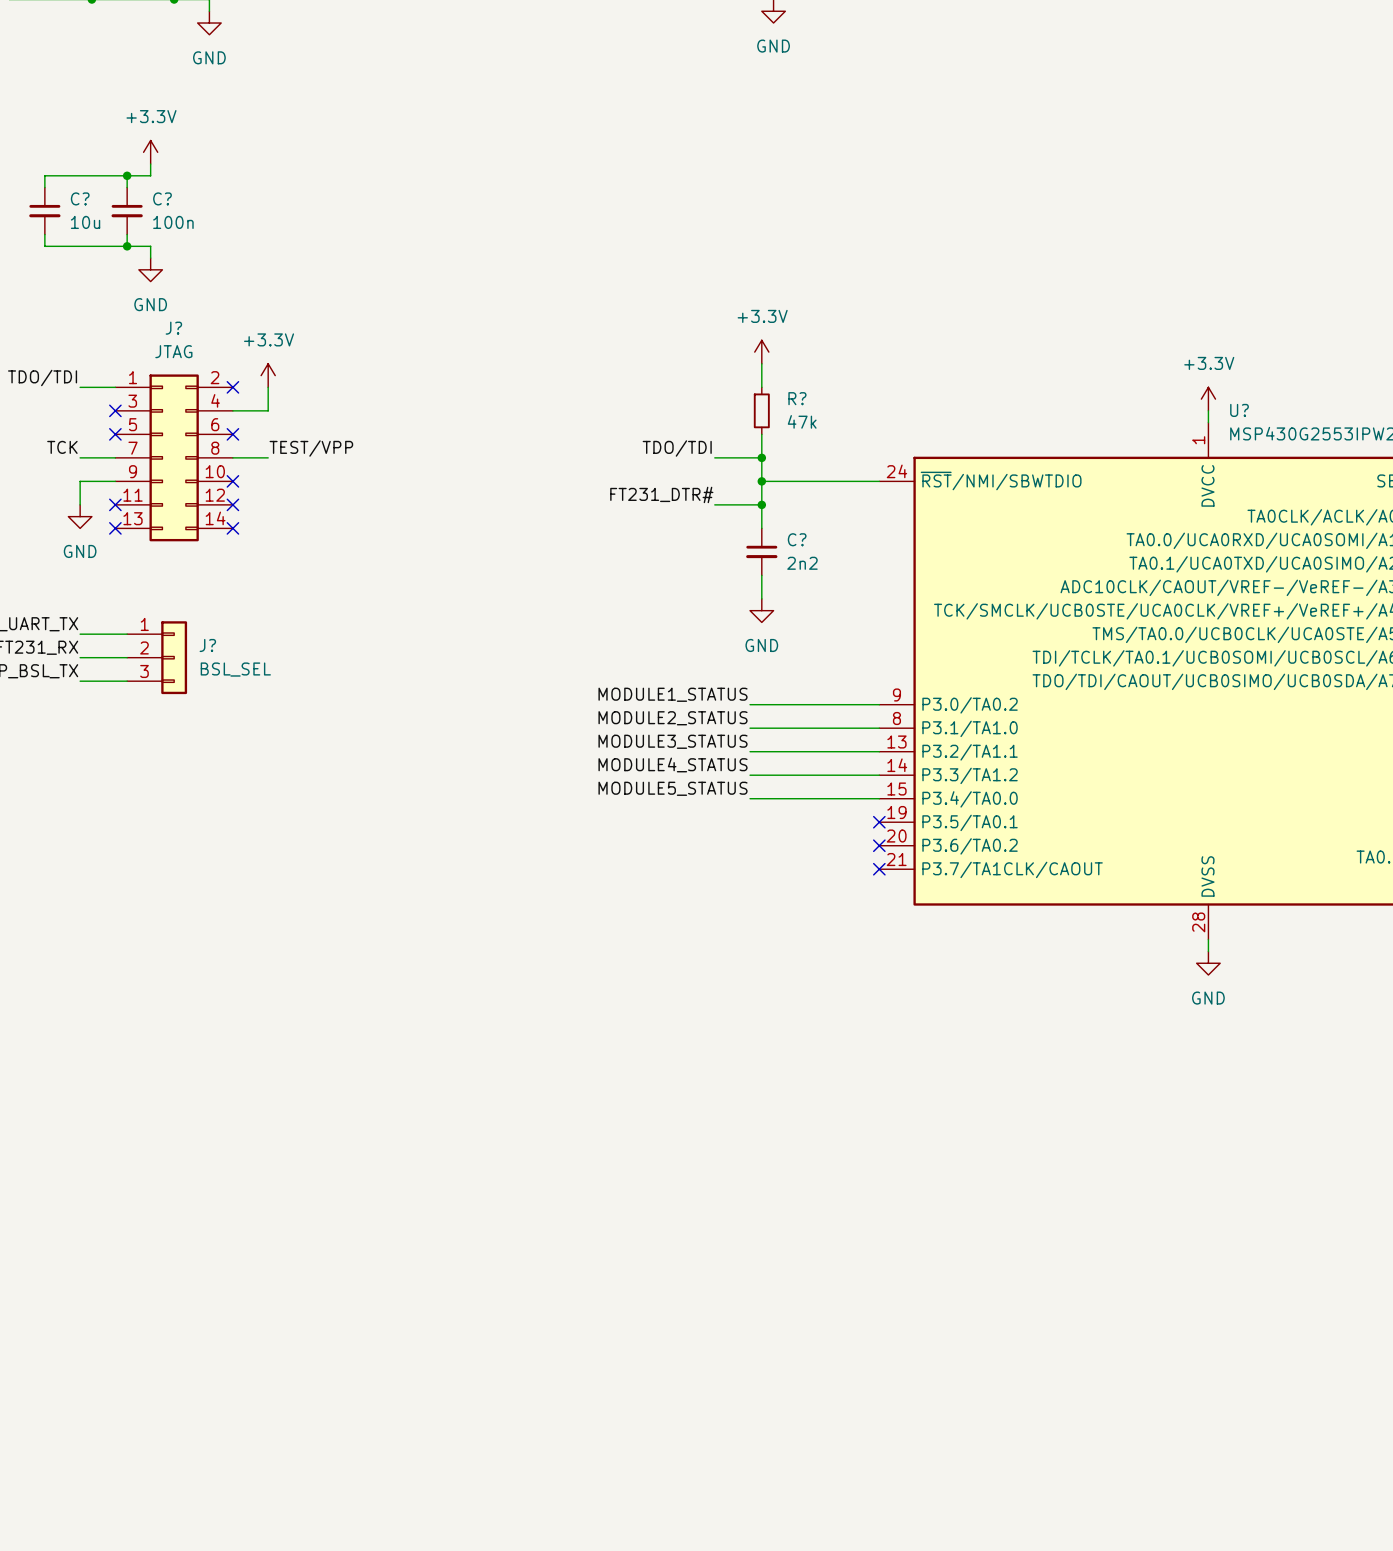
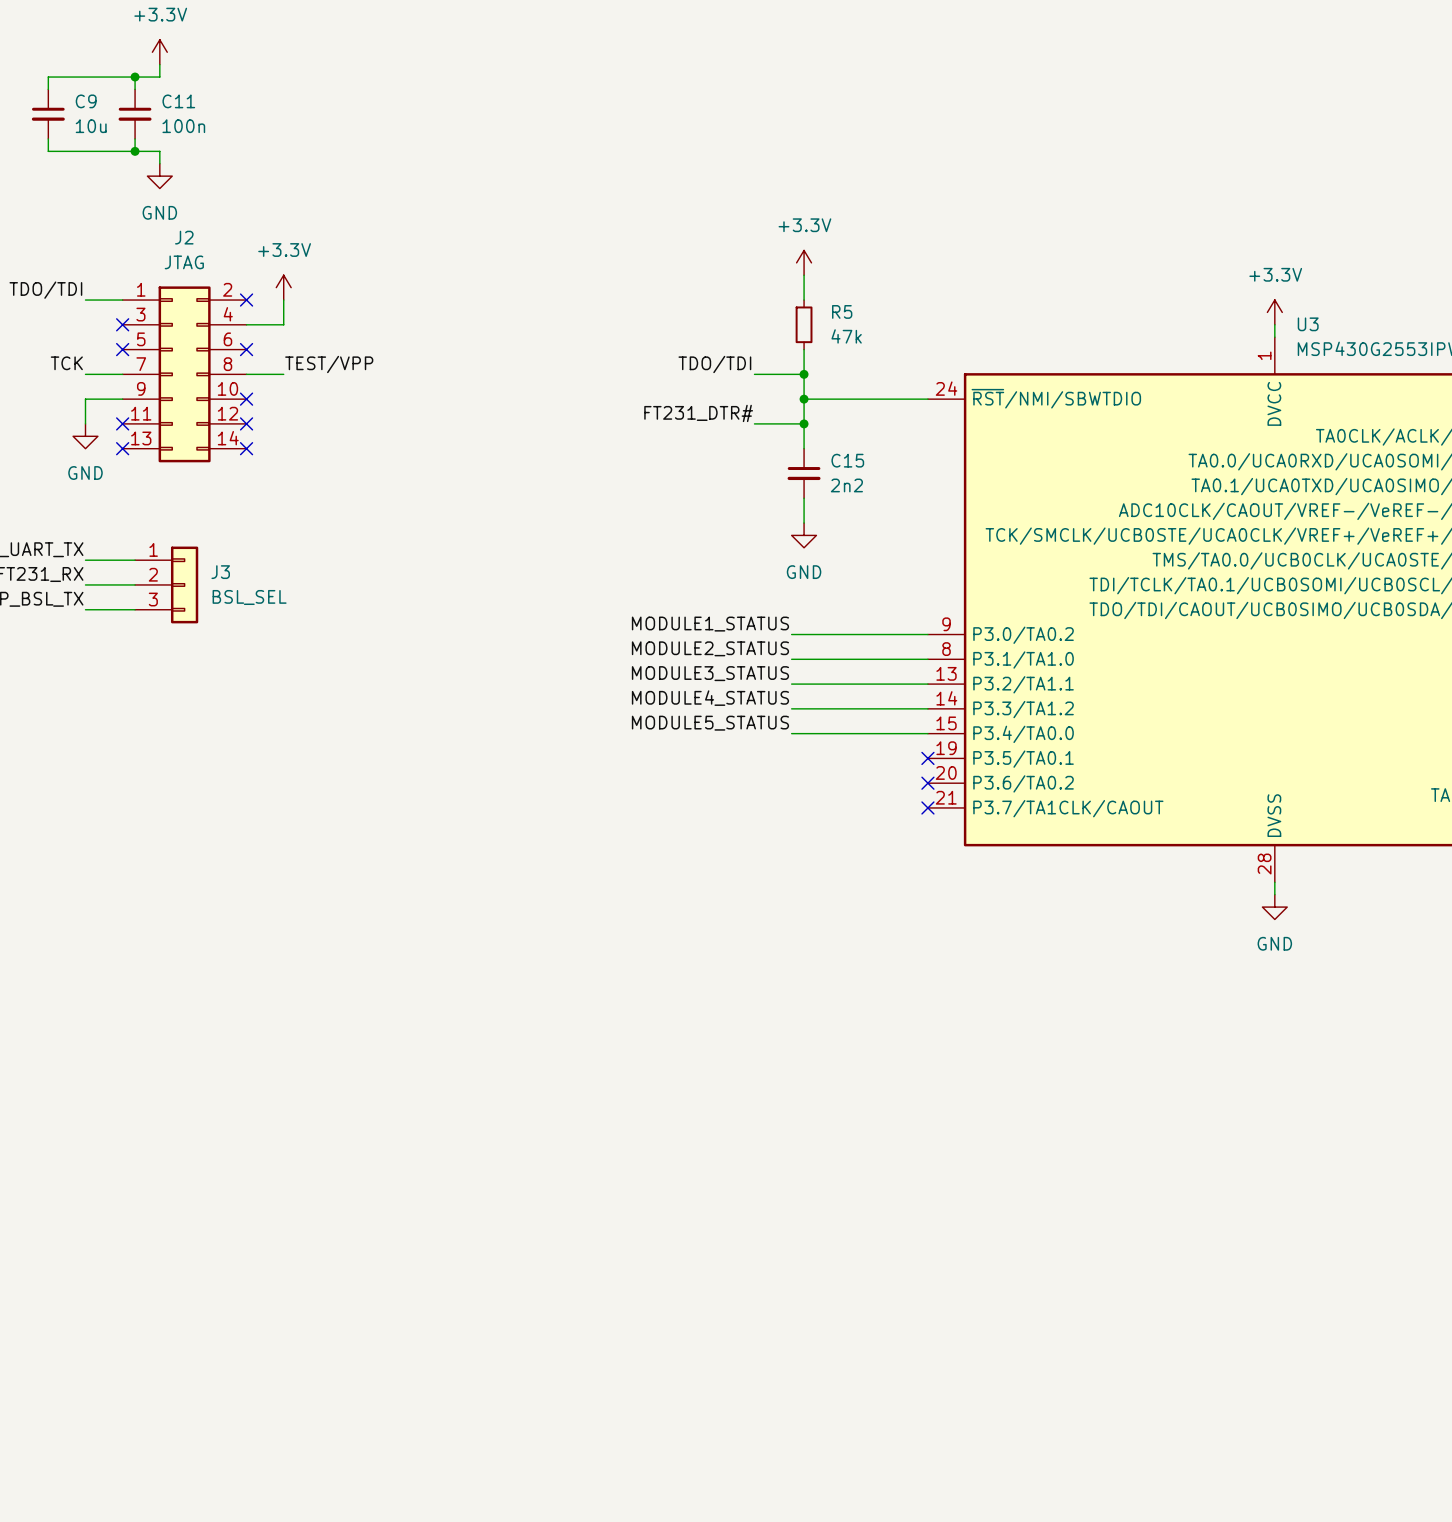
C? name: C? (80, 198) -> C9 (86, 101)
C? name: C? (162, 198) -> C11 (178, 101)
J? name: J? (173, 328) -> J2 (184, 237)
R? name: R? (797, 398) -> R5 (842, 311)
U? name: U? (1239, 410) -> U3 (1308, 324)
C? name: C? (797, 539) -> C15 (847, 460)
J? name: J? (207, 645) -> J3 (220, 572)

